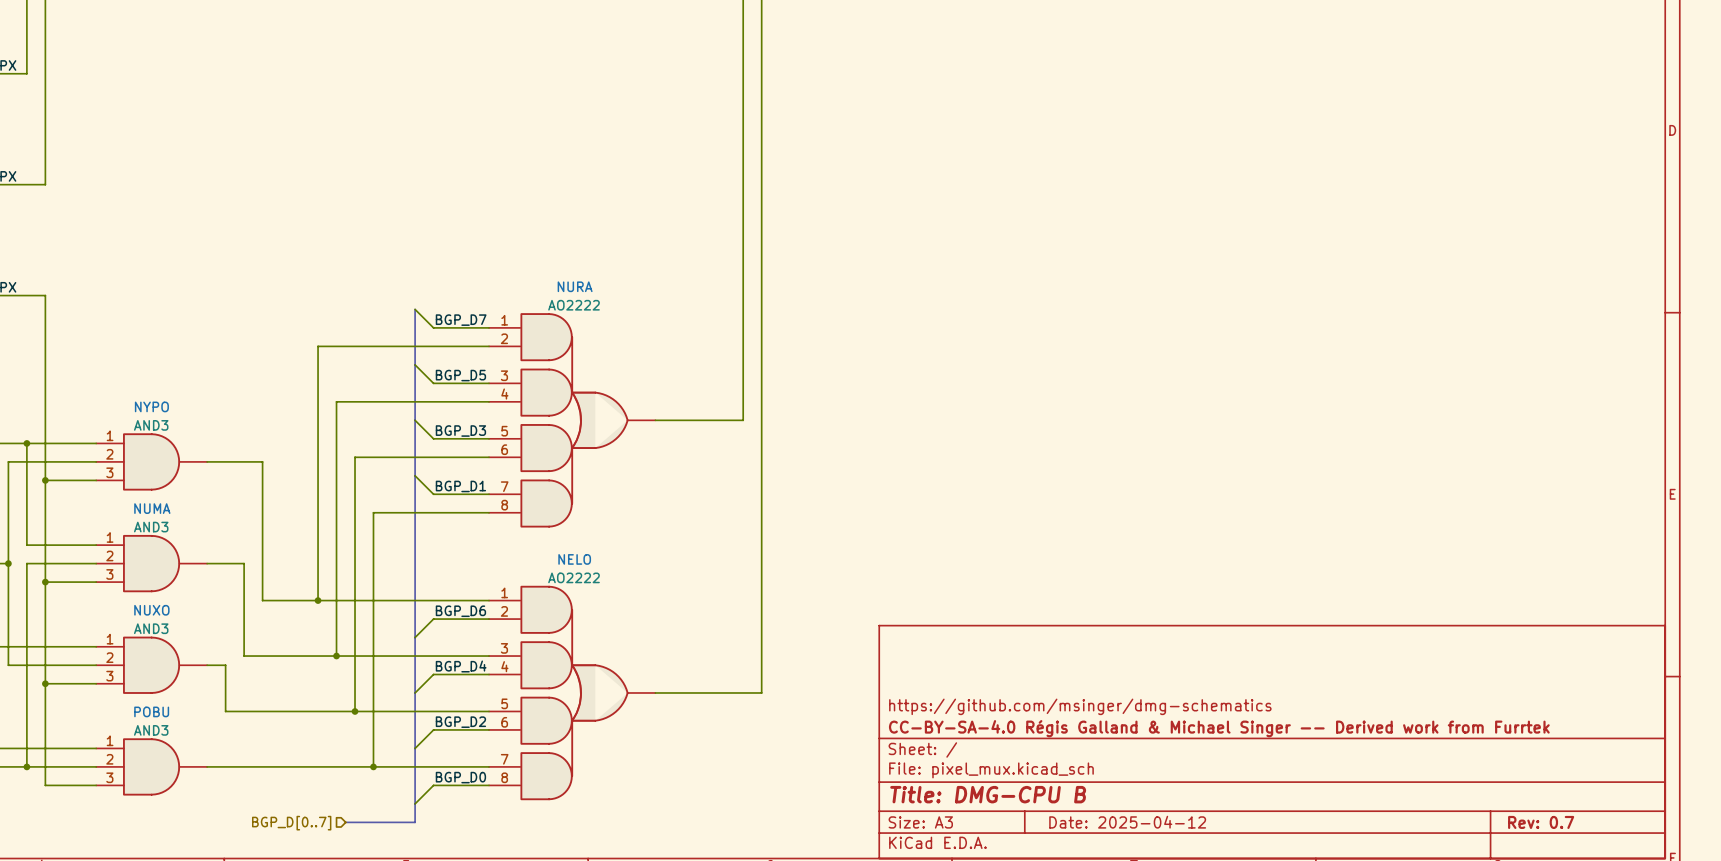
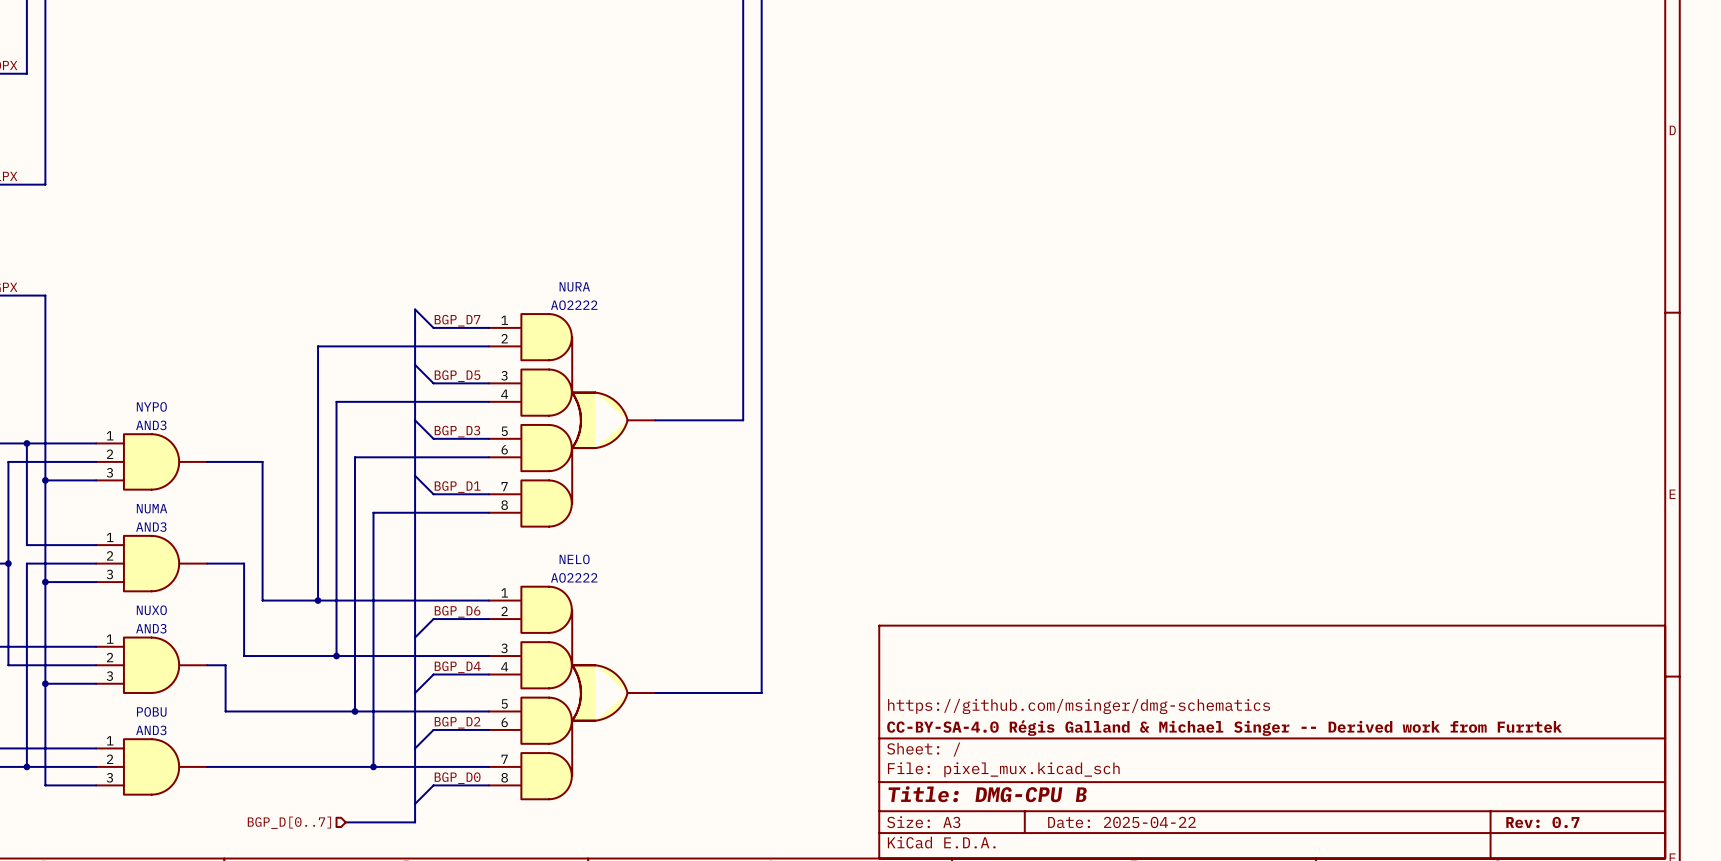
title block: Date: 2025-04-12 (1127, 822) -> Date: 2025-04-22 (1121, 822)

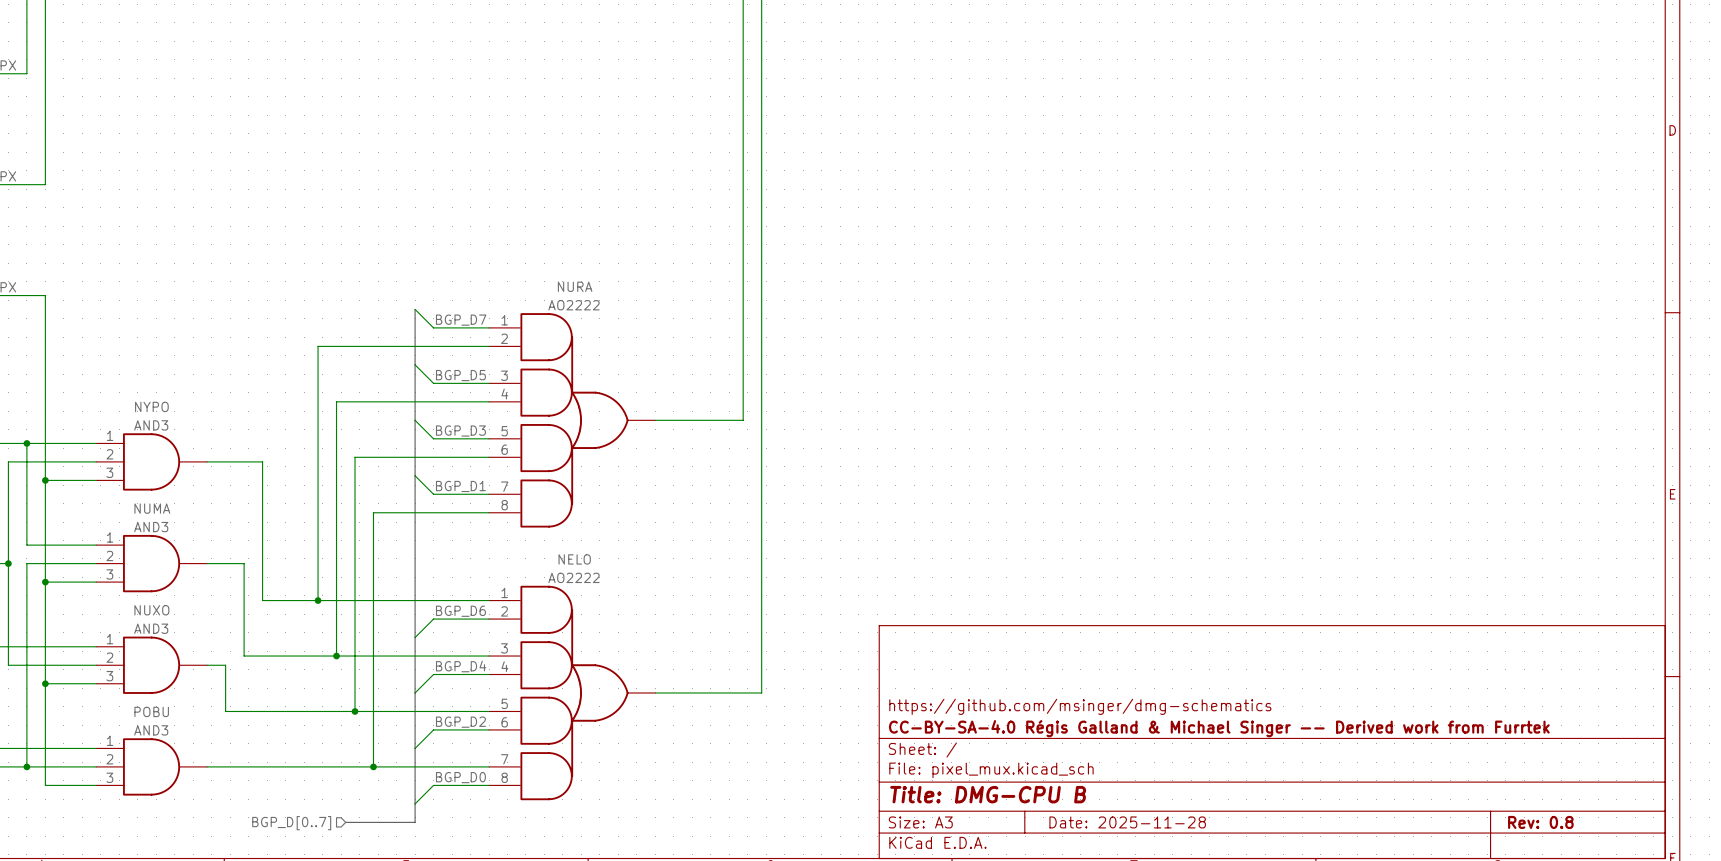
title block: Date: 2025-04-22 (1121, 822) -> Date: 2025-11-28 (1127, 822)
title block: Rev: 0.7 (1542, 822) -> Rev: 0.8 (1540, 822)

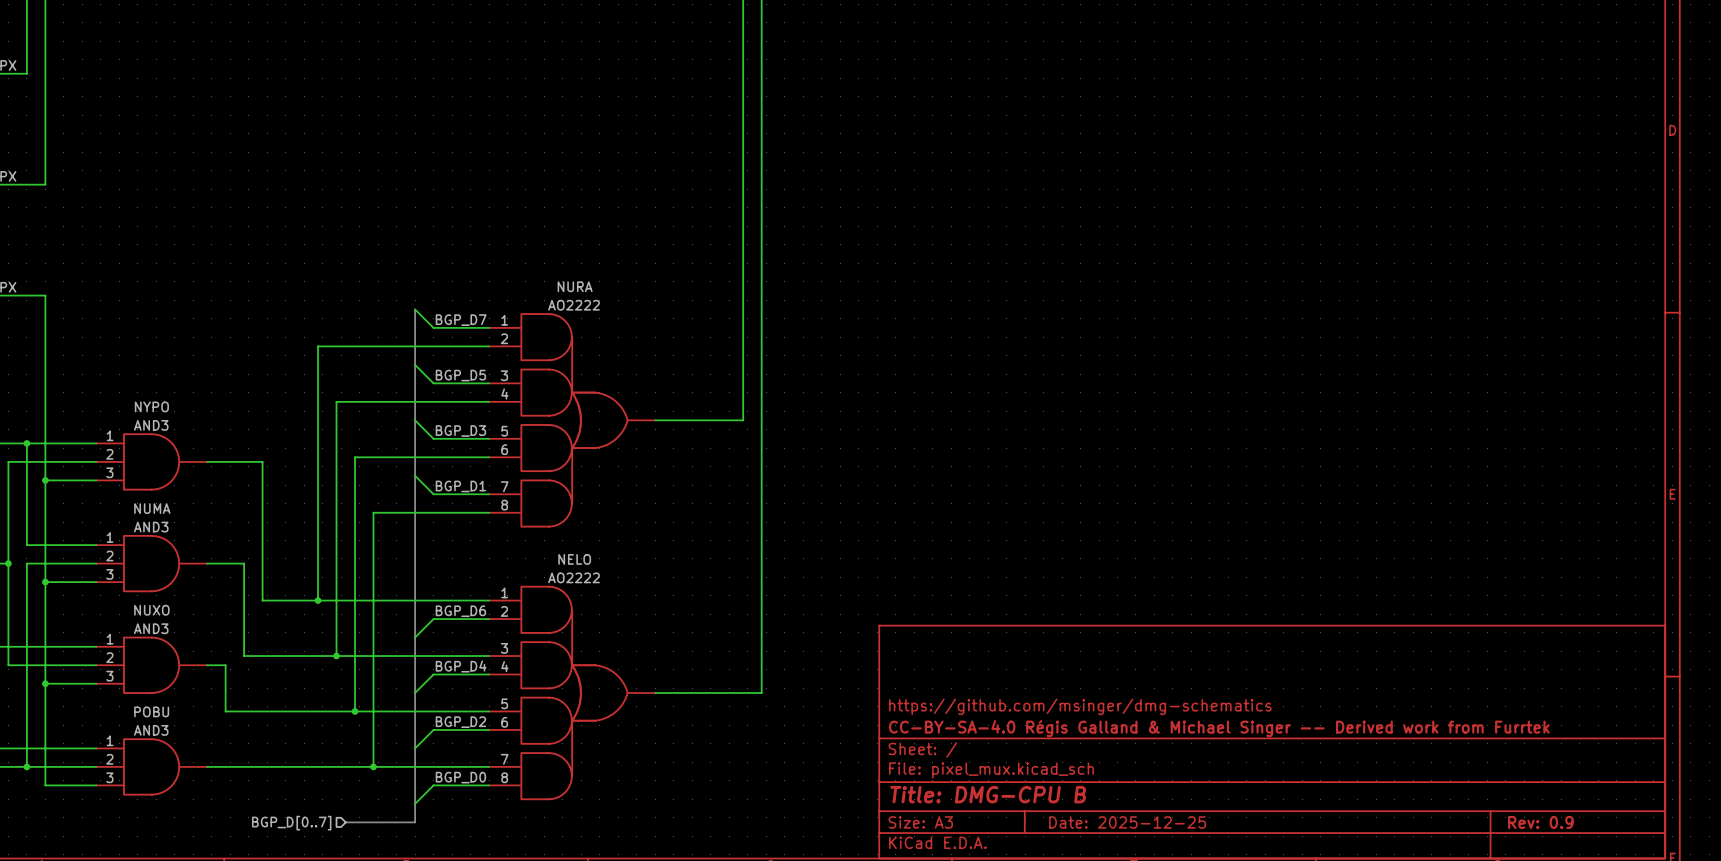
title block: Date: 2025-11-28 (1127, 822) -> Date: 2025-12-25 (1127, 822)
title block: Rev: 0.8 (1540, 822) -> Rev: 0.9 (1540, 822)

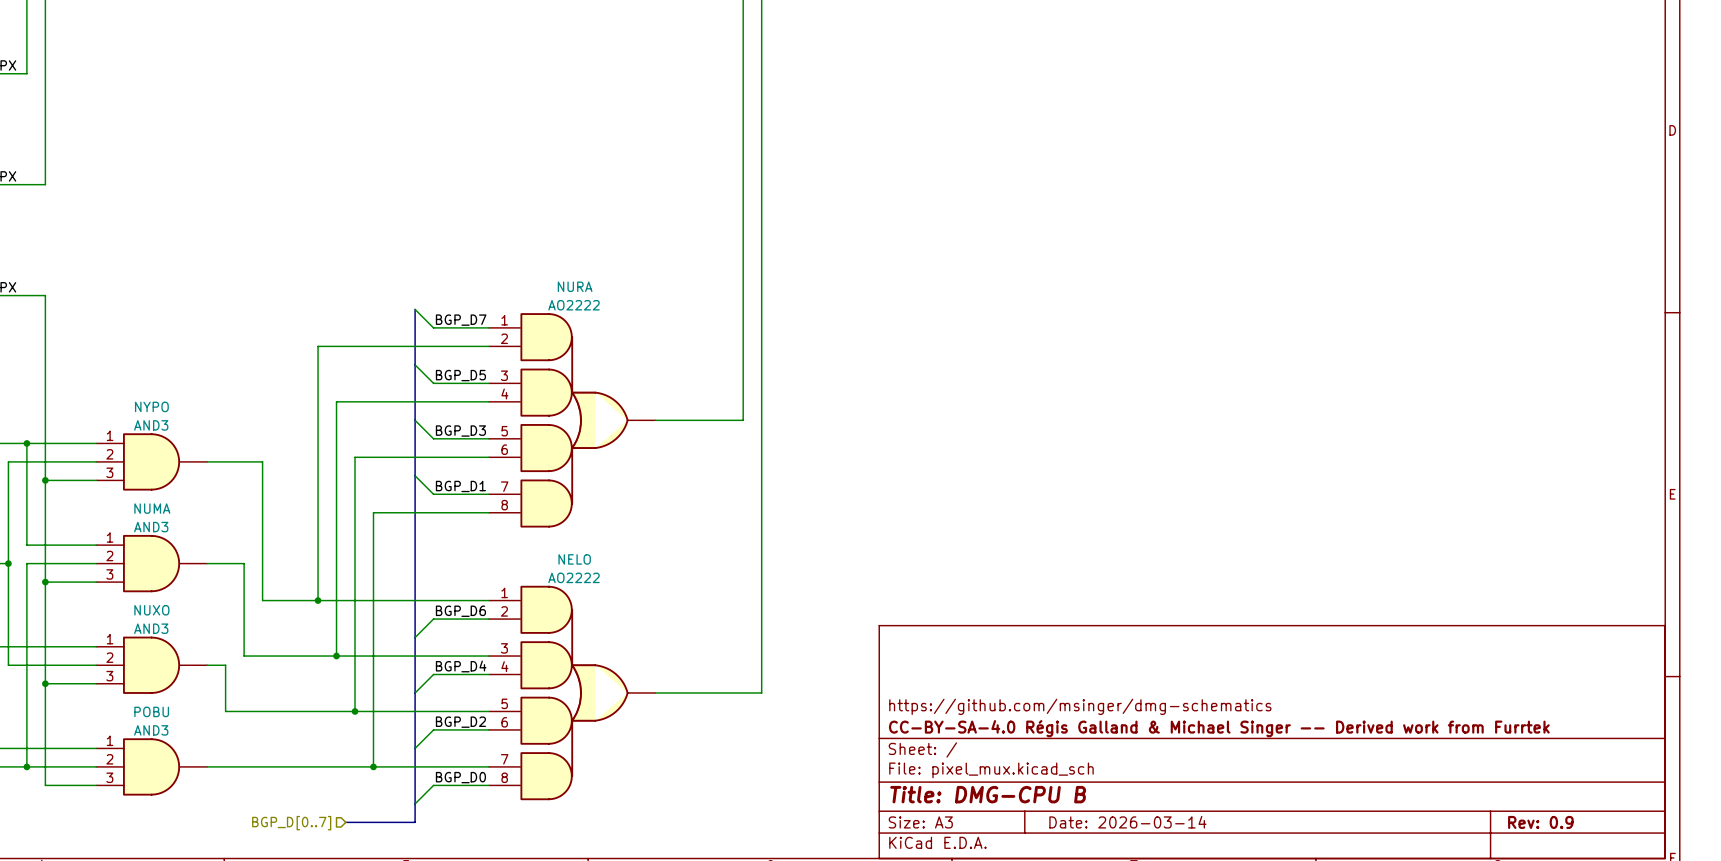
title block: Date: 2025-12-25 (1127, 822) -> Date: 2026-03-14 (1127, 822)

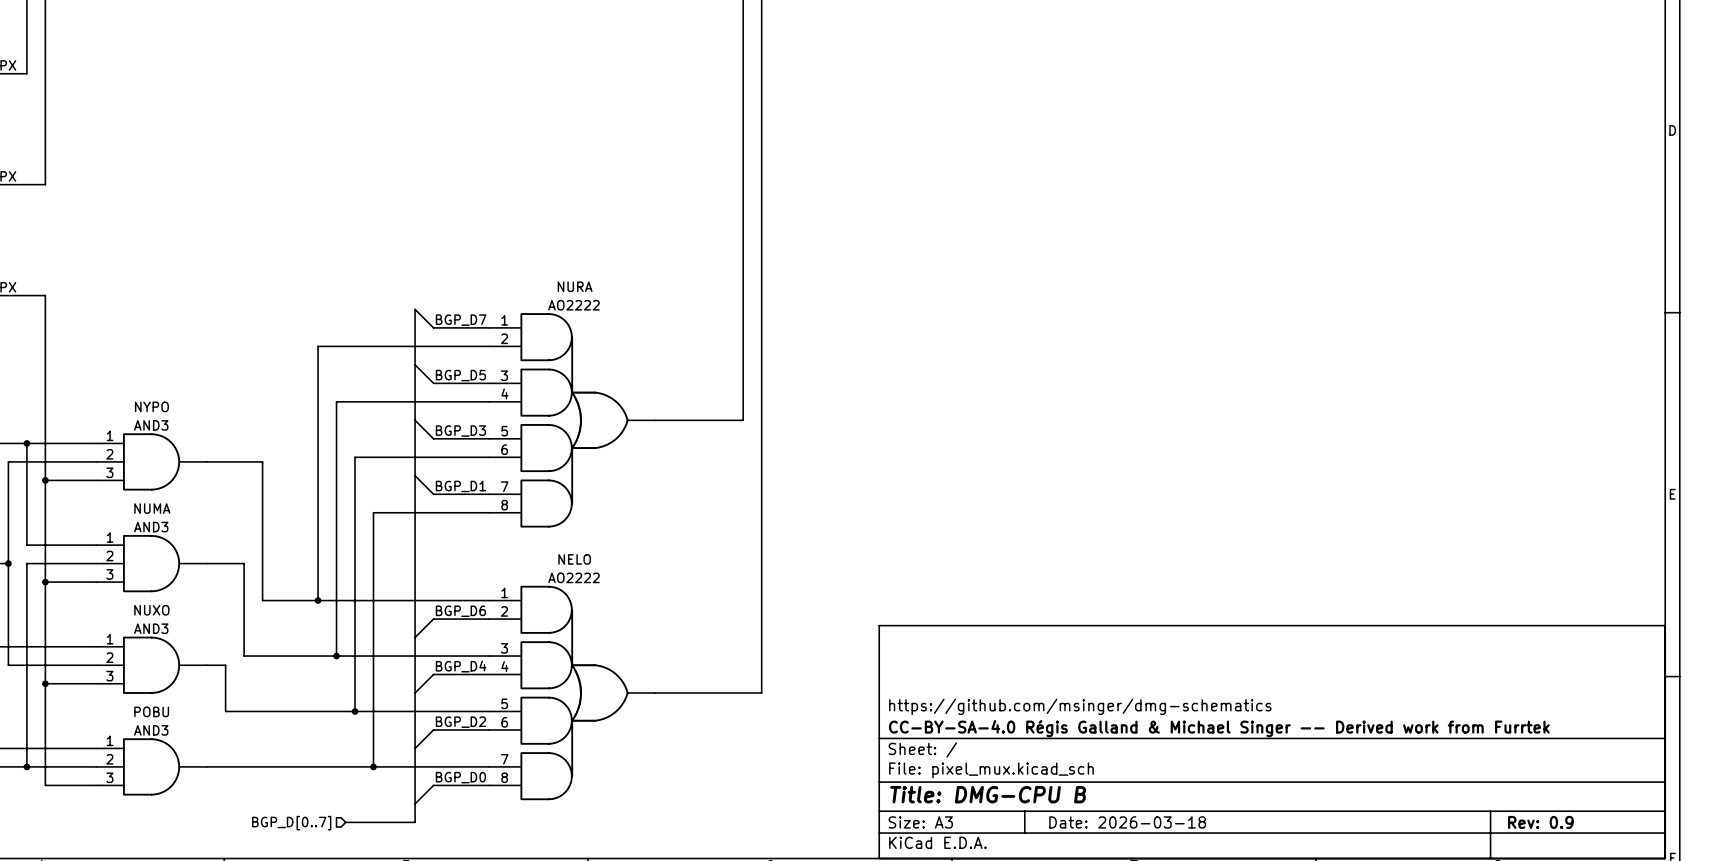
title block: Date: 2026-03-14 (1127, 822) -> Date: 2026-03-18 (1127, 822)

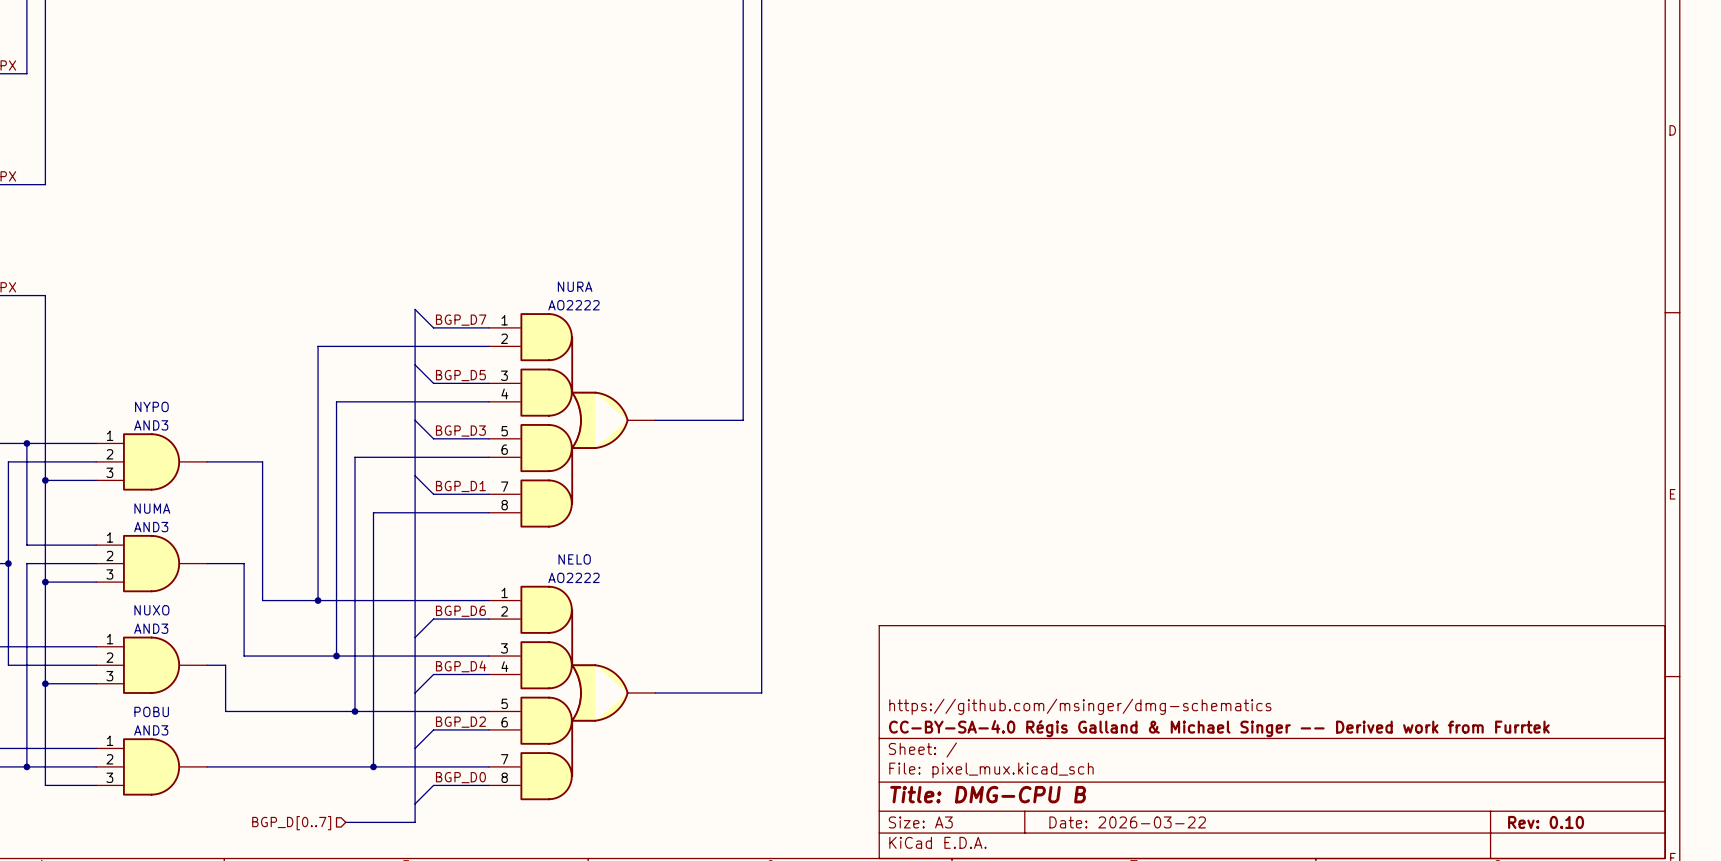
title block: Date: 2026-03-18 (1127, 822) -> Date: 2026-03-22 (1127, 822)
title block: Rev: 0.9 (1540, 822) -> Rev: 0.10 (1546, 822)

